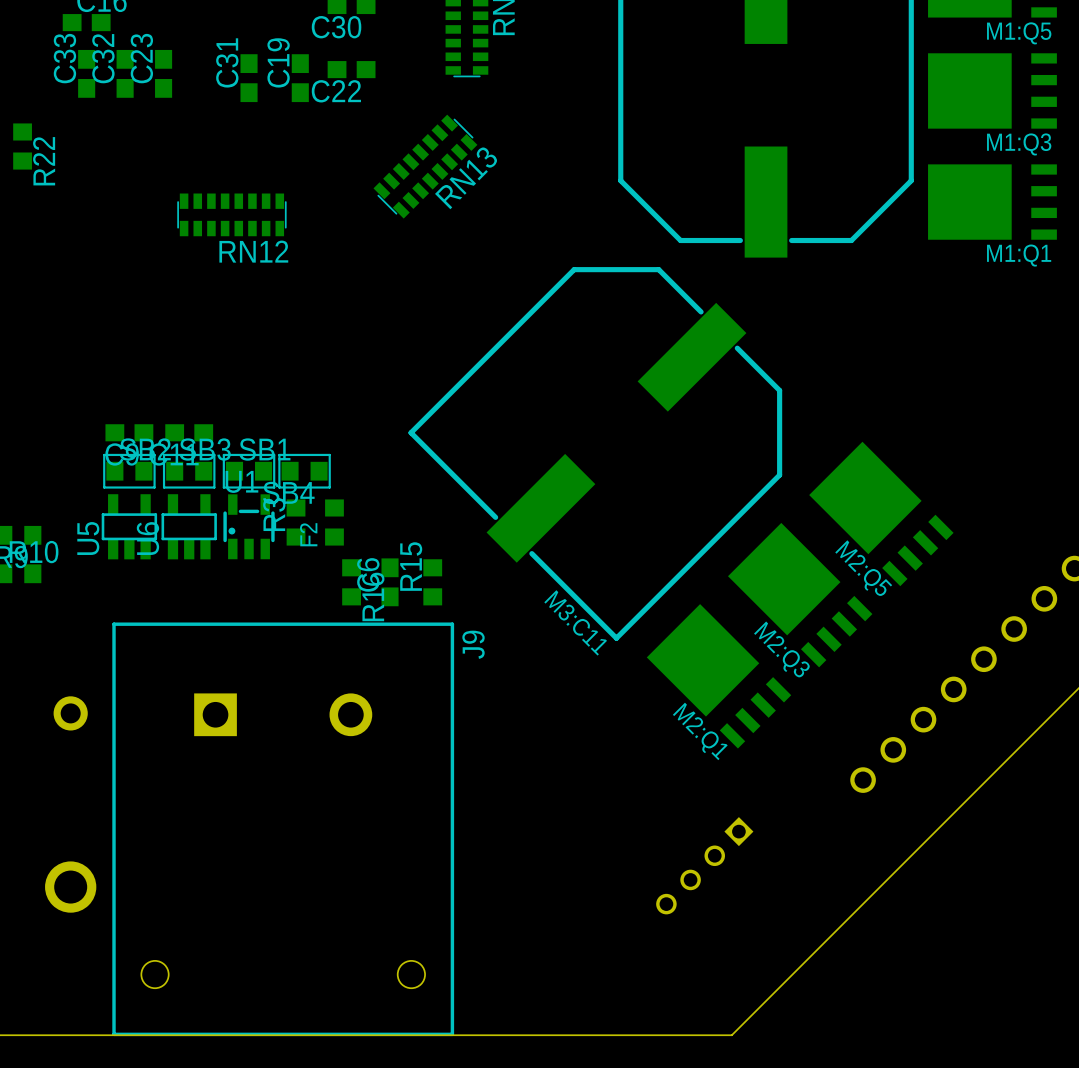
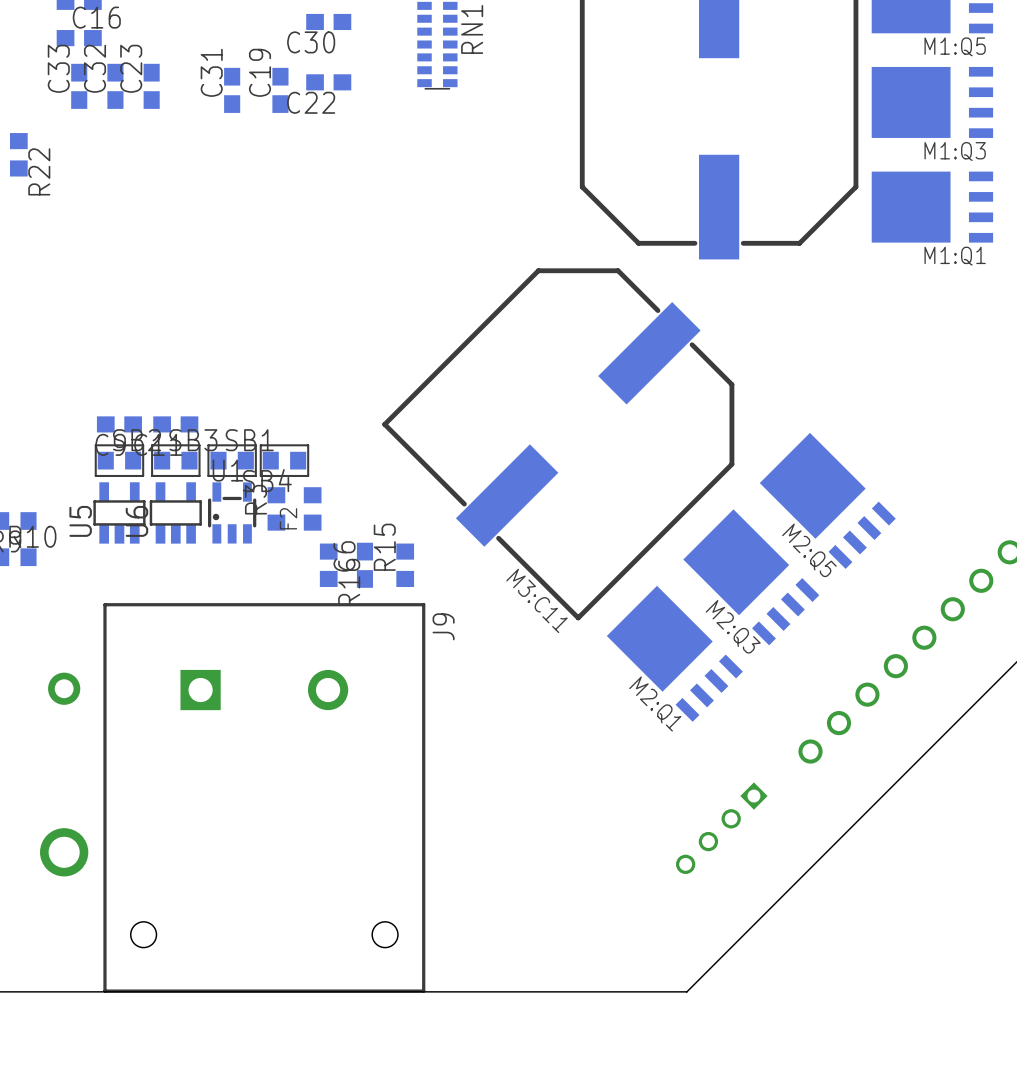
RN13: (425, 166) -> none
RN12: (231, 214) -> none
part position: (704, 865) -> (721, 828)

